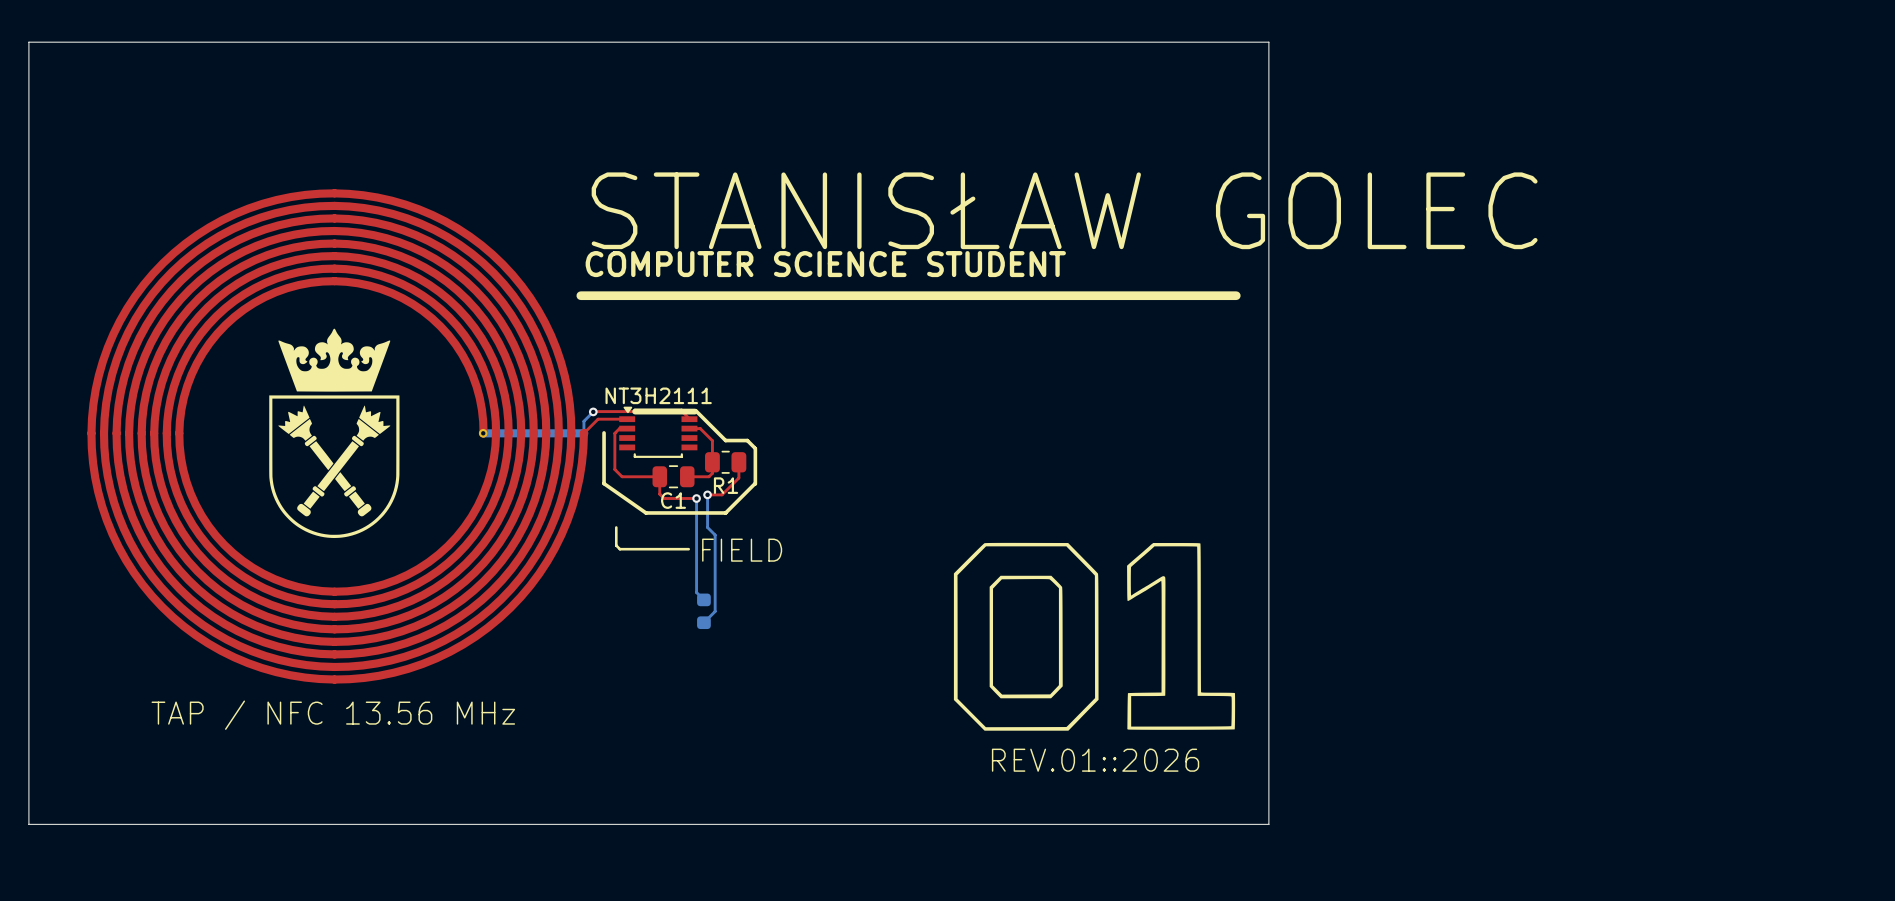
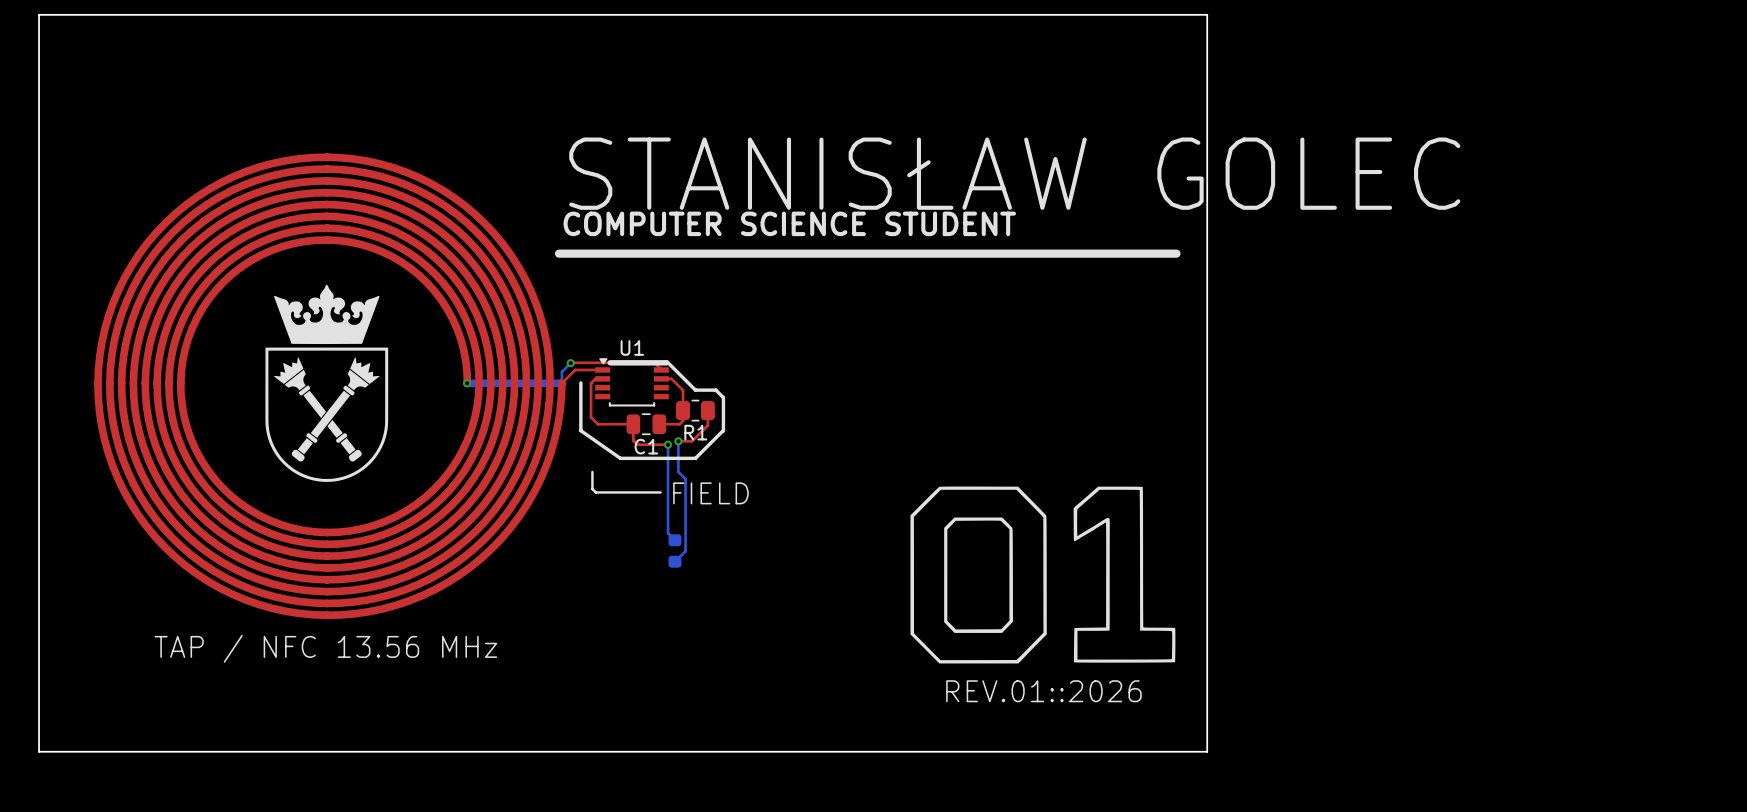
NT3H2111: (658, 432) -> none
U1: none -> (632, 382)

